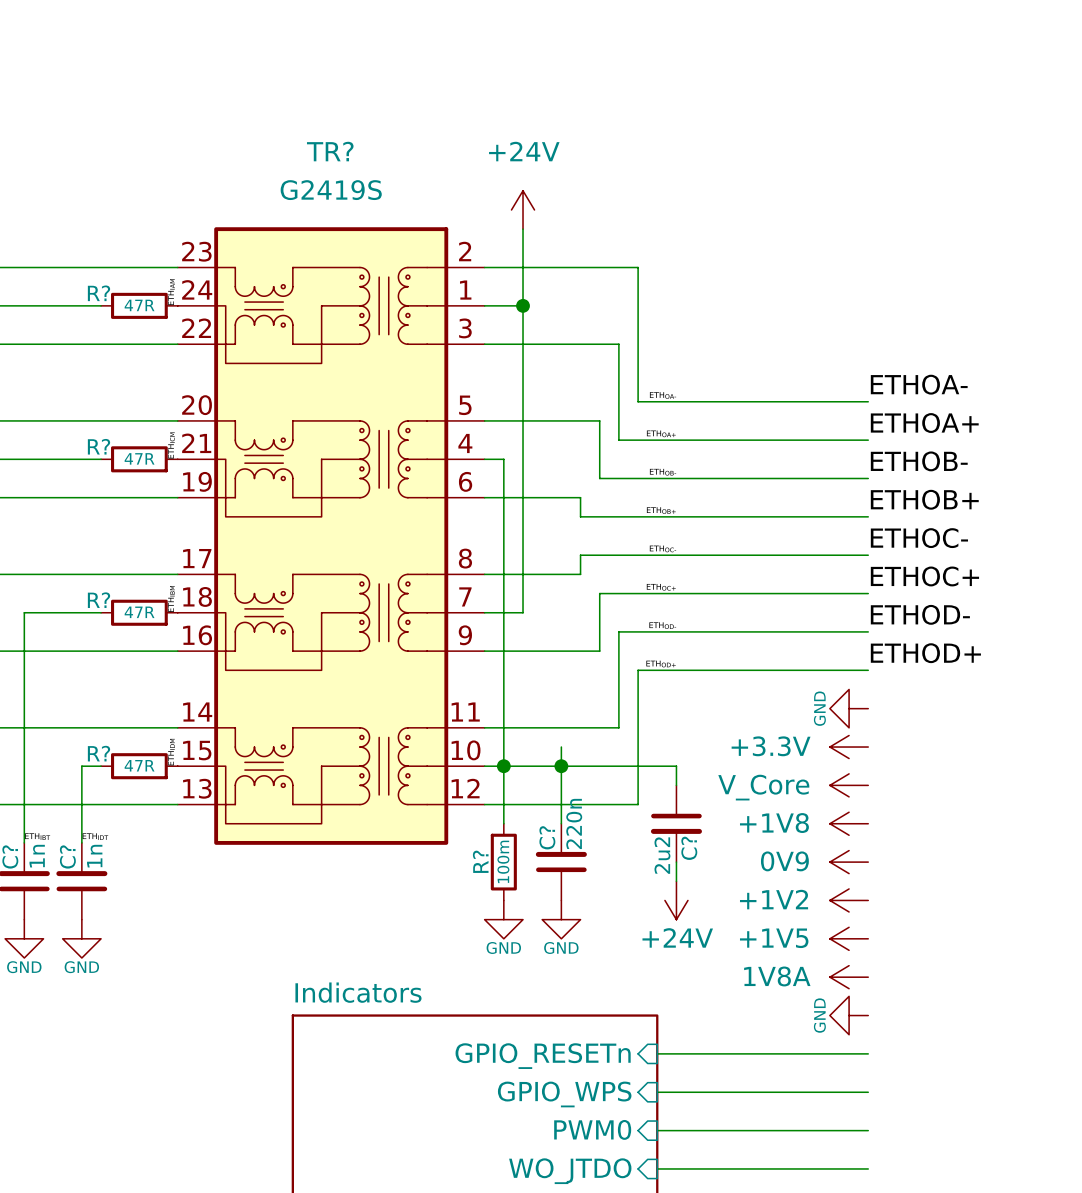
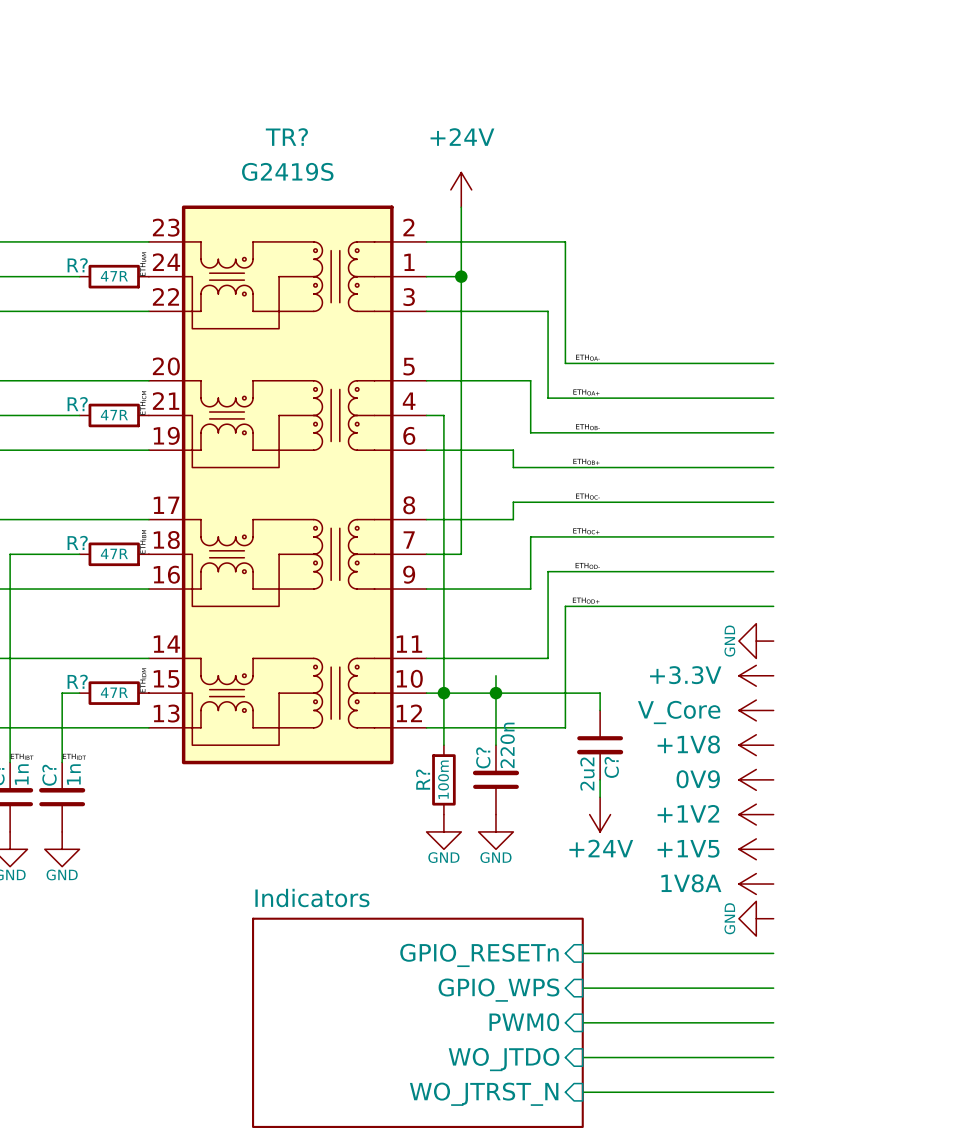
label: ETHOA- (919, 384) -> none
label: ETHOA+ (924, 423) -> none
label: ETHOB- (919, 461) -> none
label: ETHOB+ (924, 499) -> none
label: ETHOC- (919, 538) -> none
label: ETHOC+ (924, 576) -> none
label: ETHOD- (920, 614) -> none
label: ETHOD+ (925, 653) -> none

